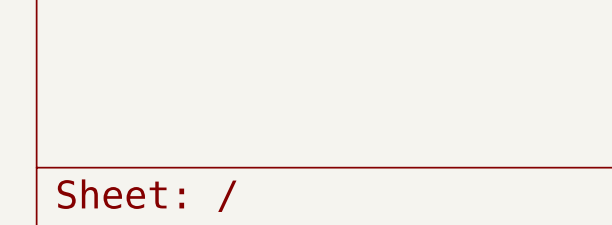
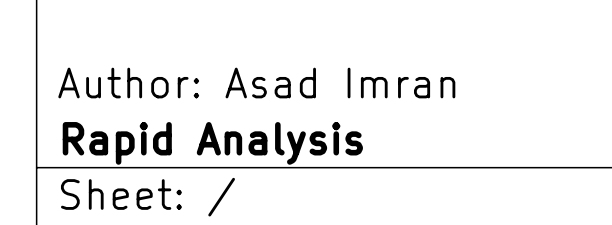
title block: none -> Author: Asad Imran (256, 83)
title block: none -> Rapid Analysis (212, 143)

